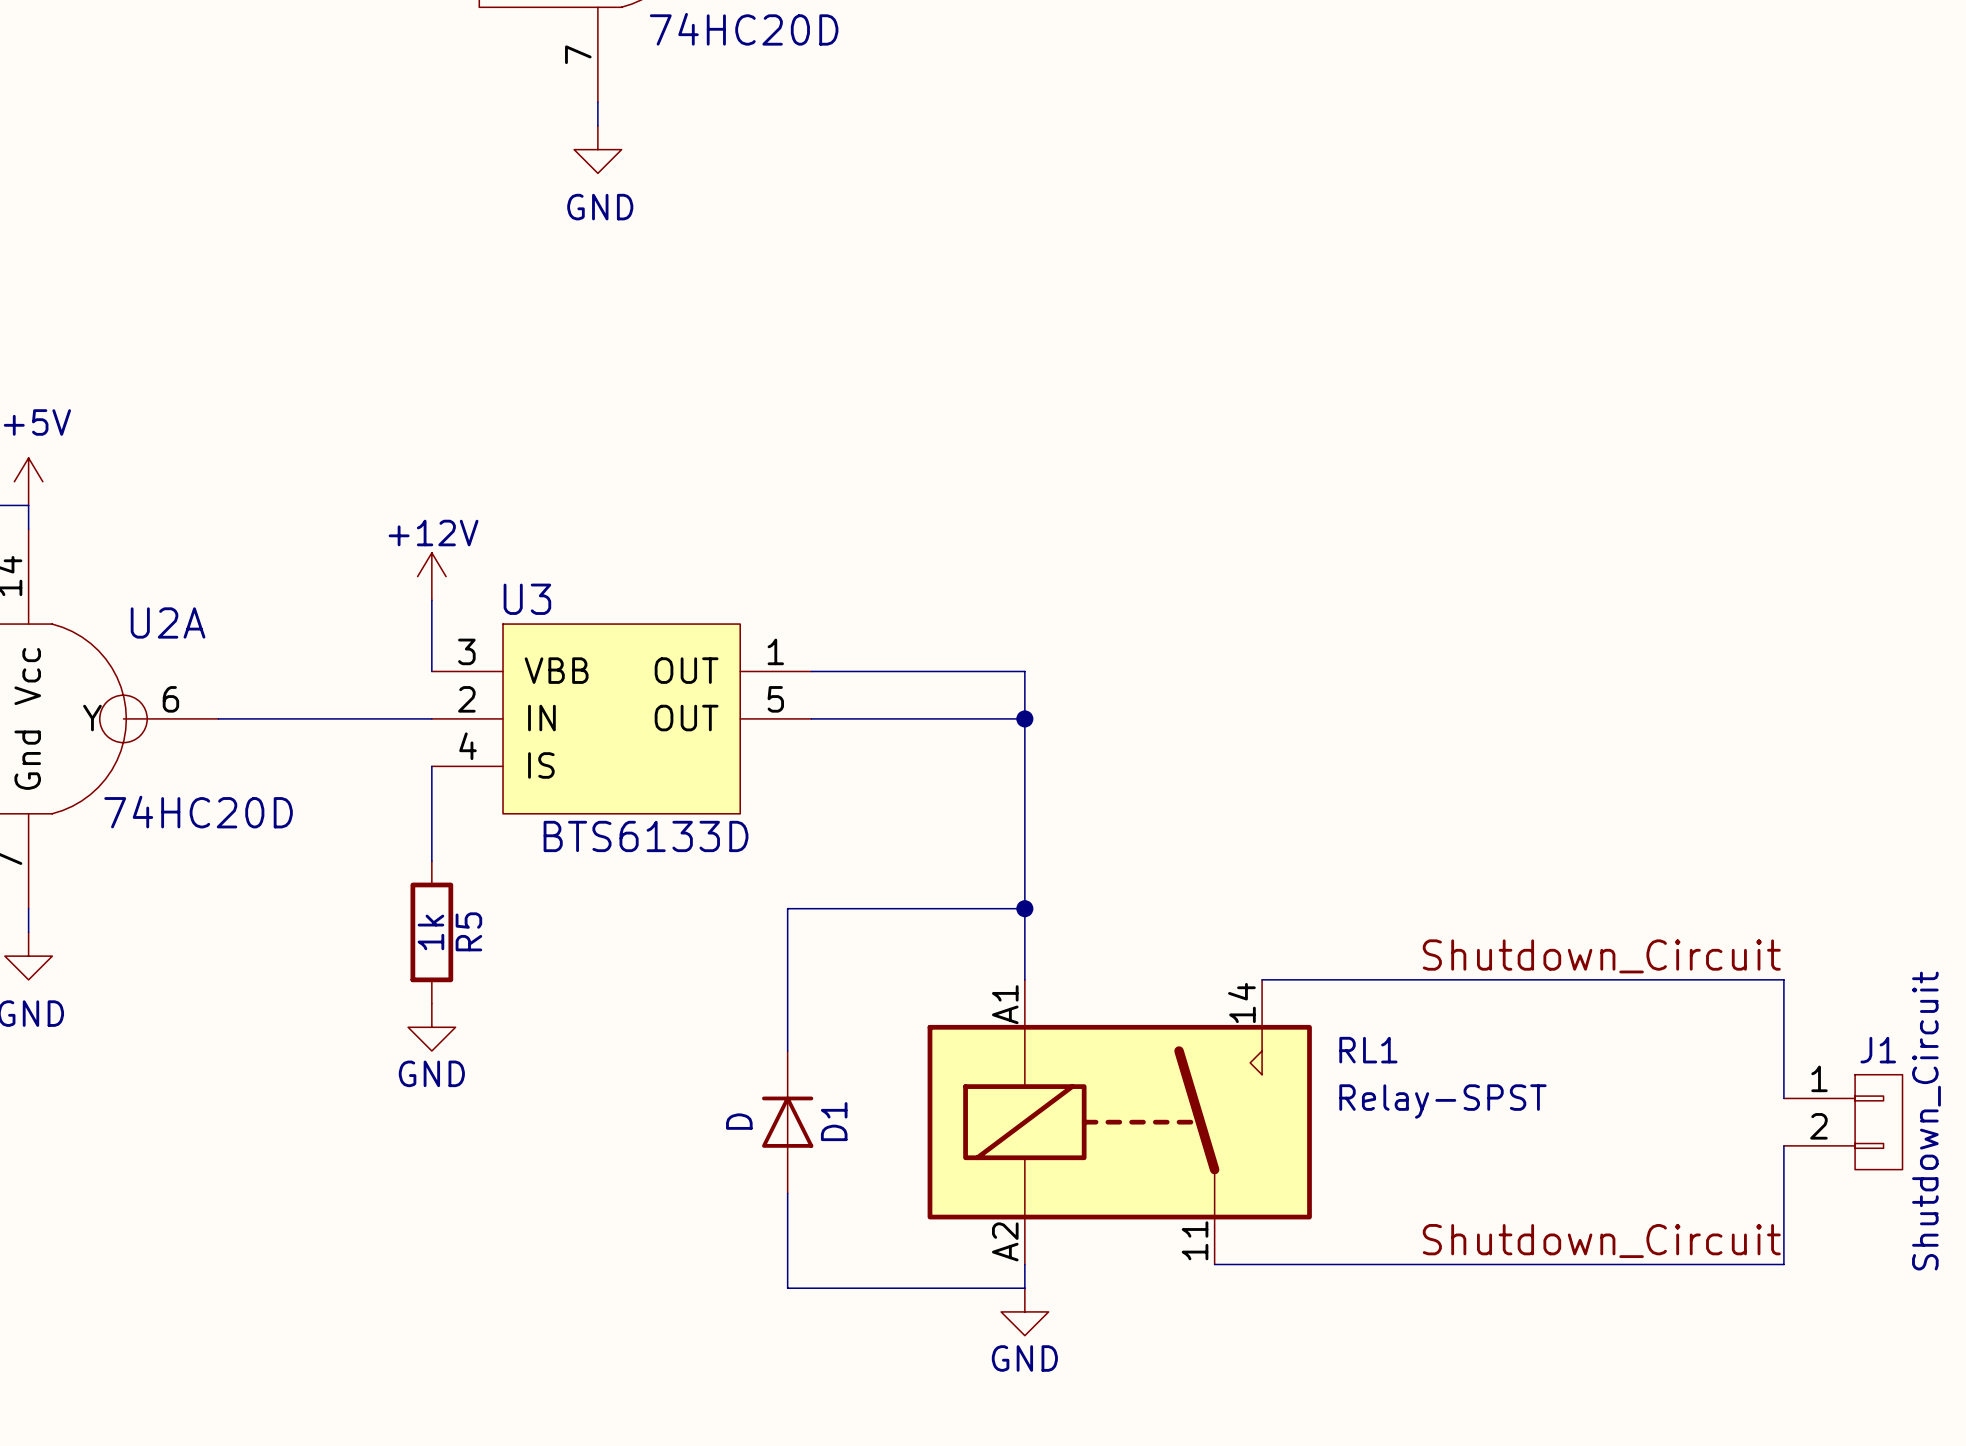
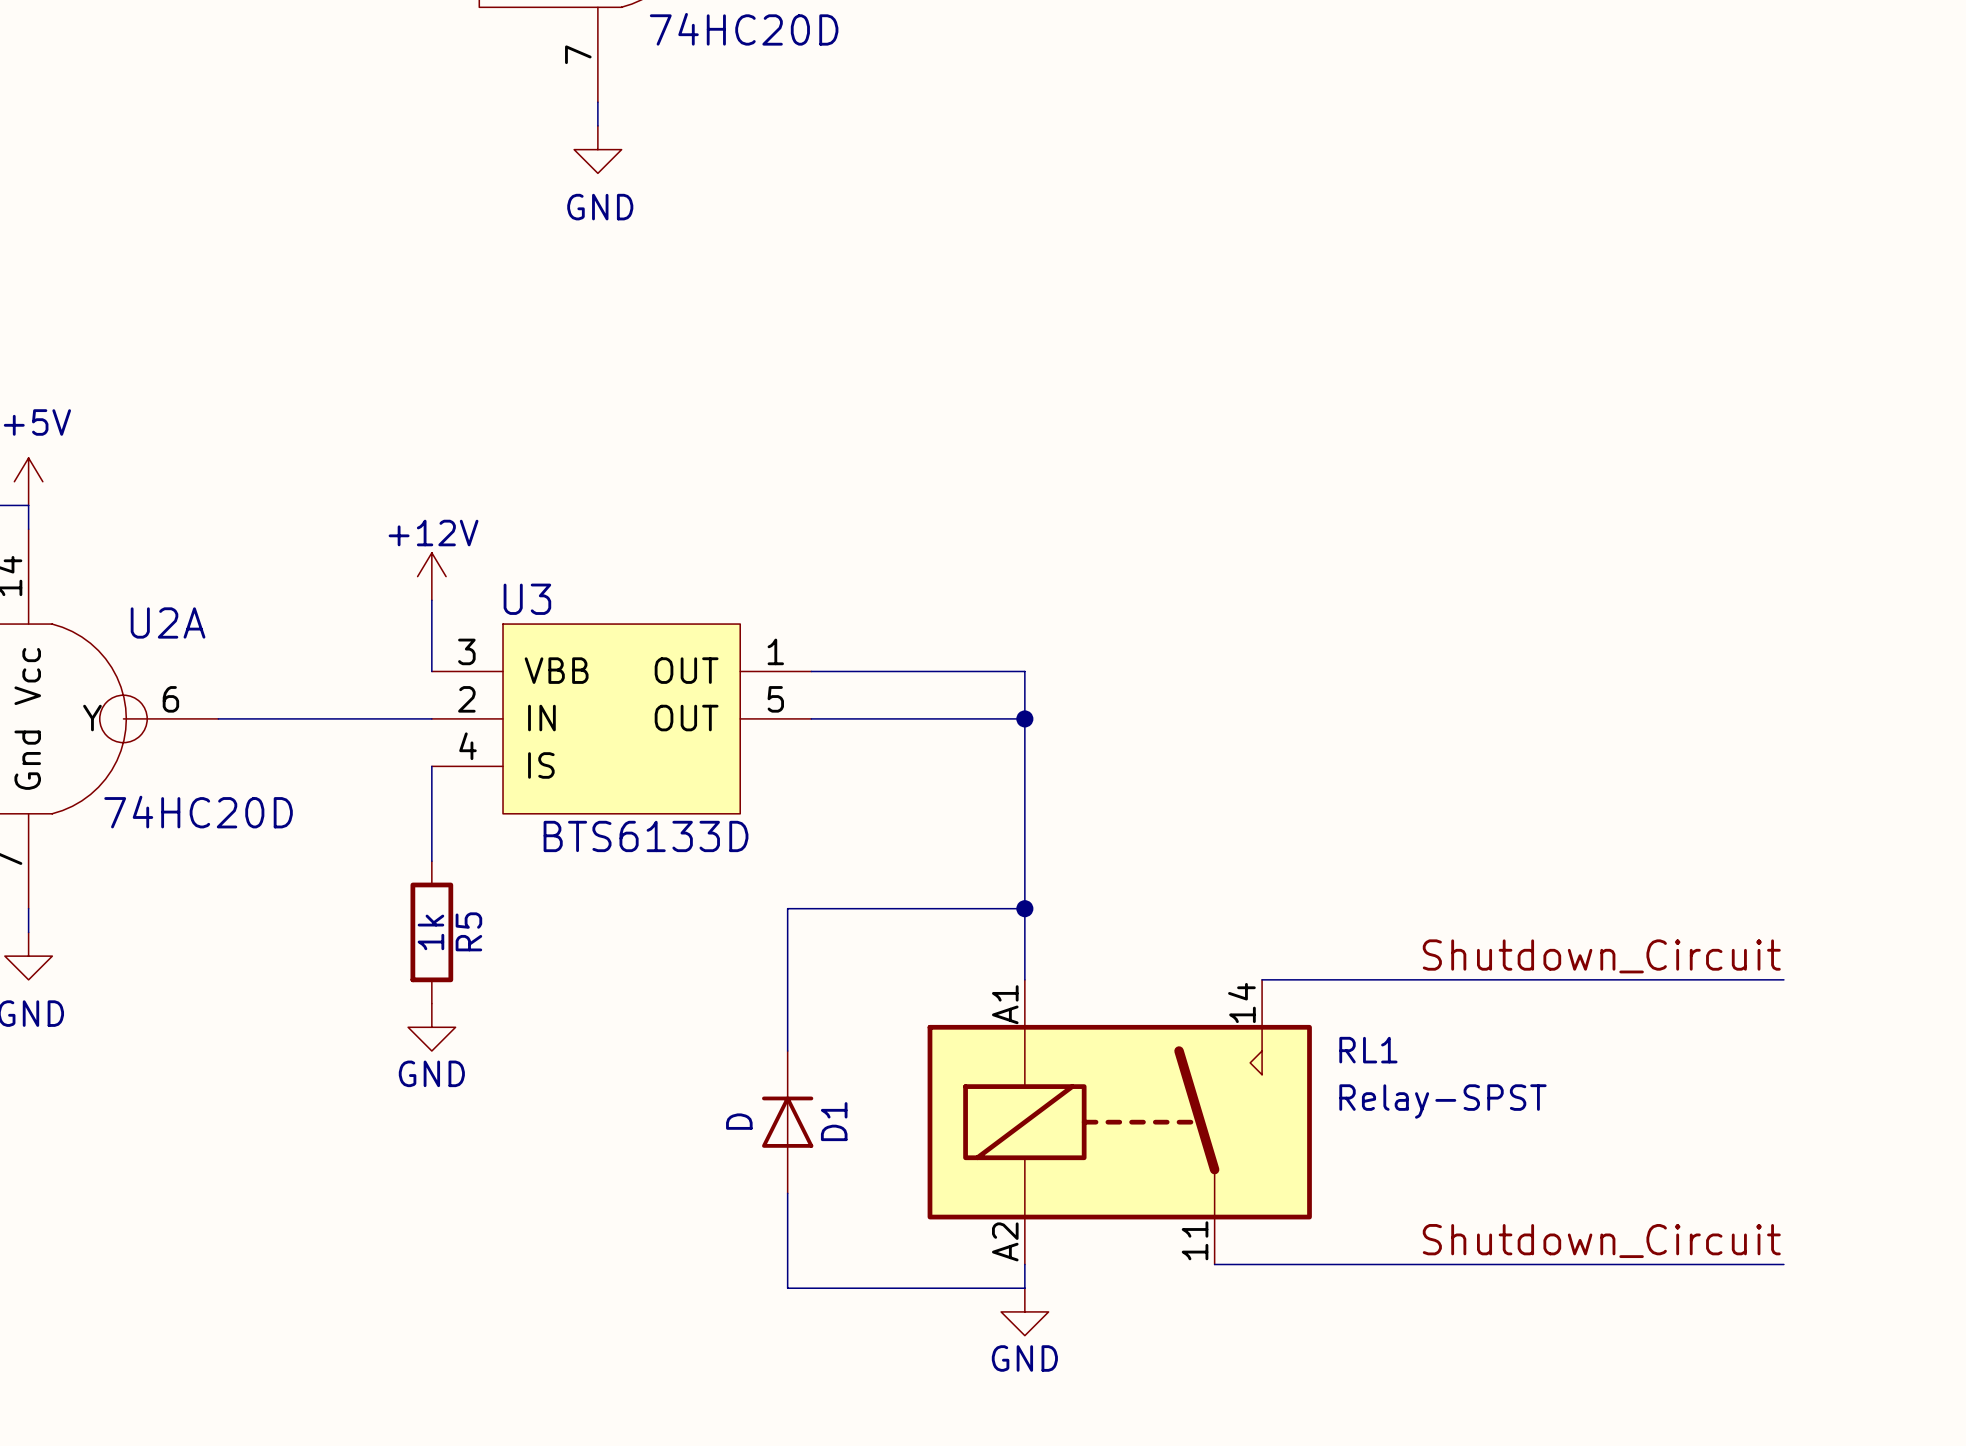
wire: (1783, 979) (1783, 1098) -> none
J1: Shutdown_Circuit (1843, 1122) -> none
wire: (1783, 1145) (1783, 1264) -> none

